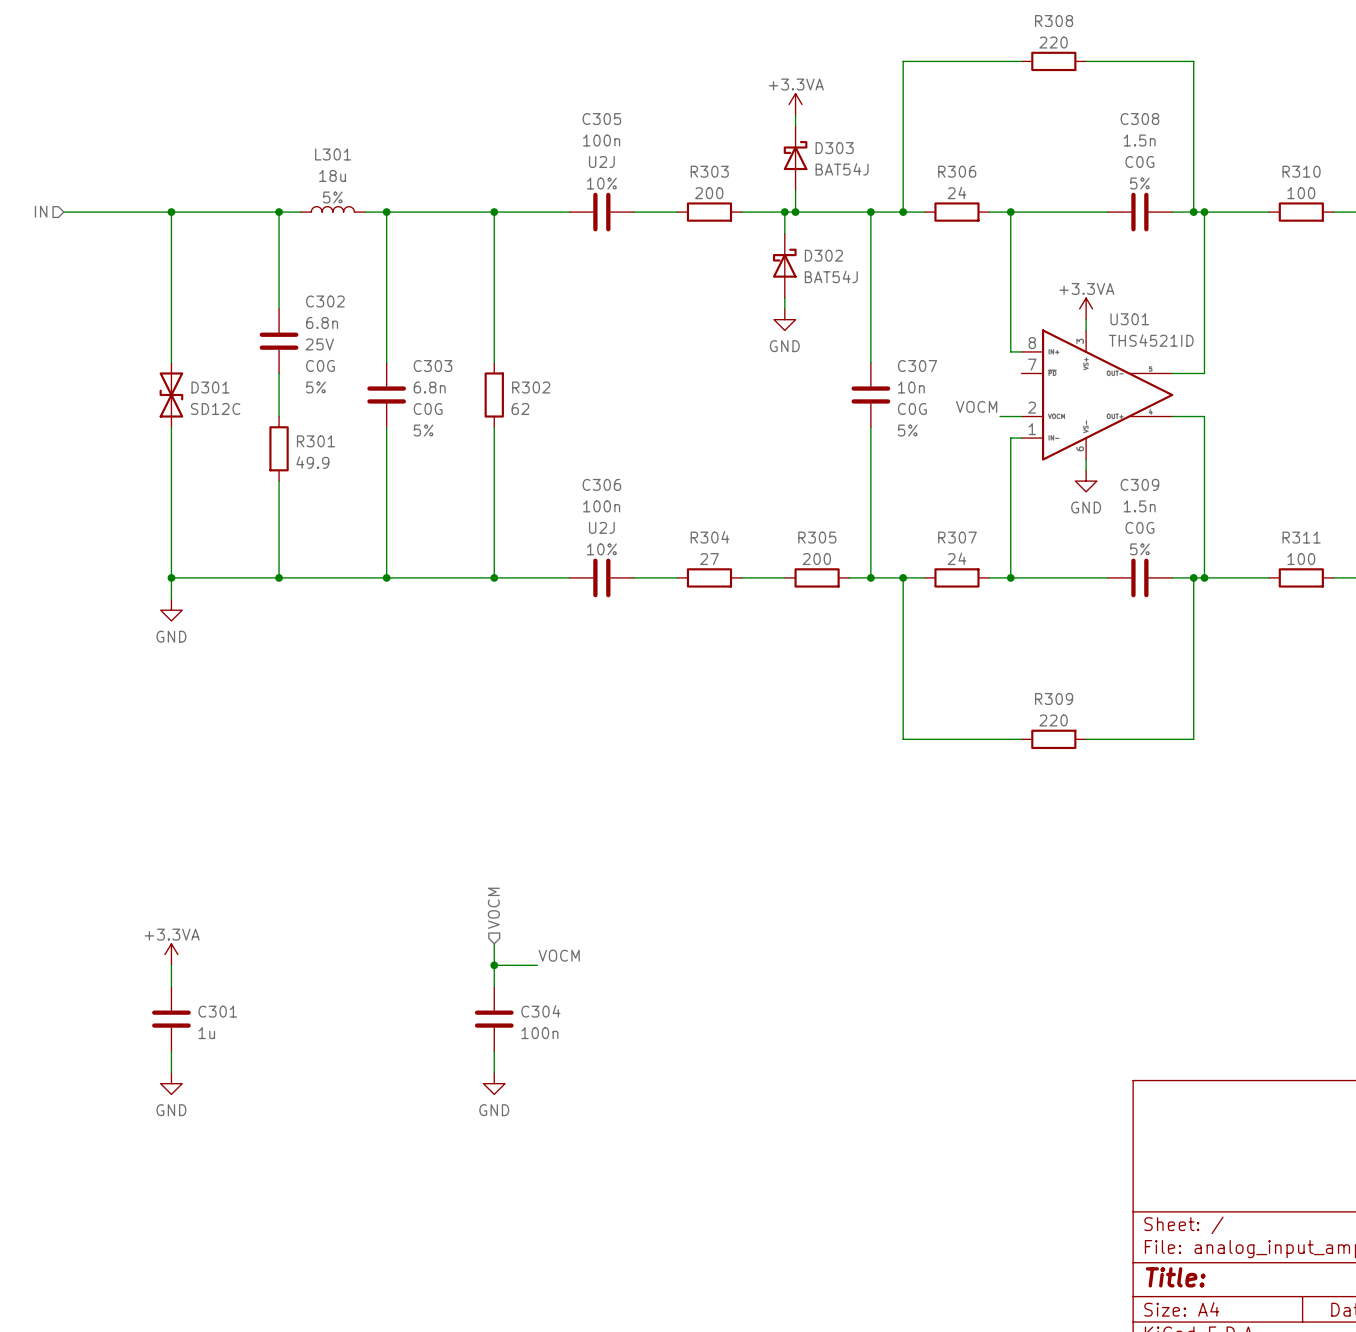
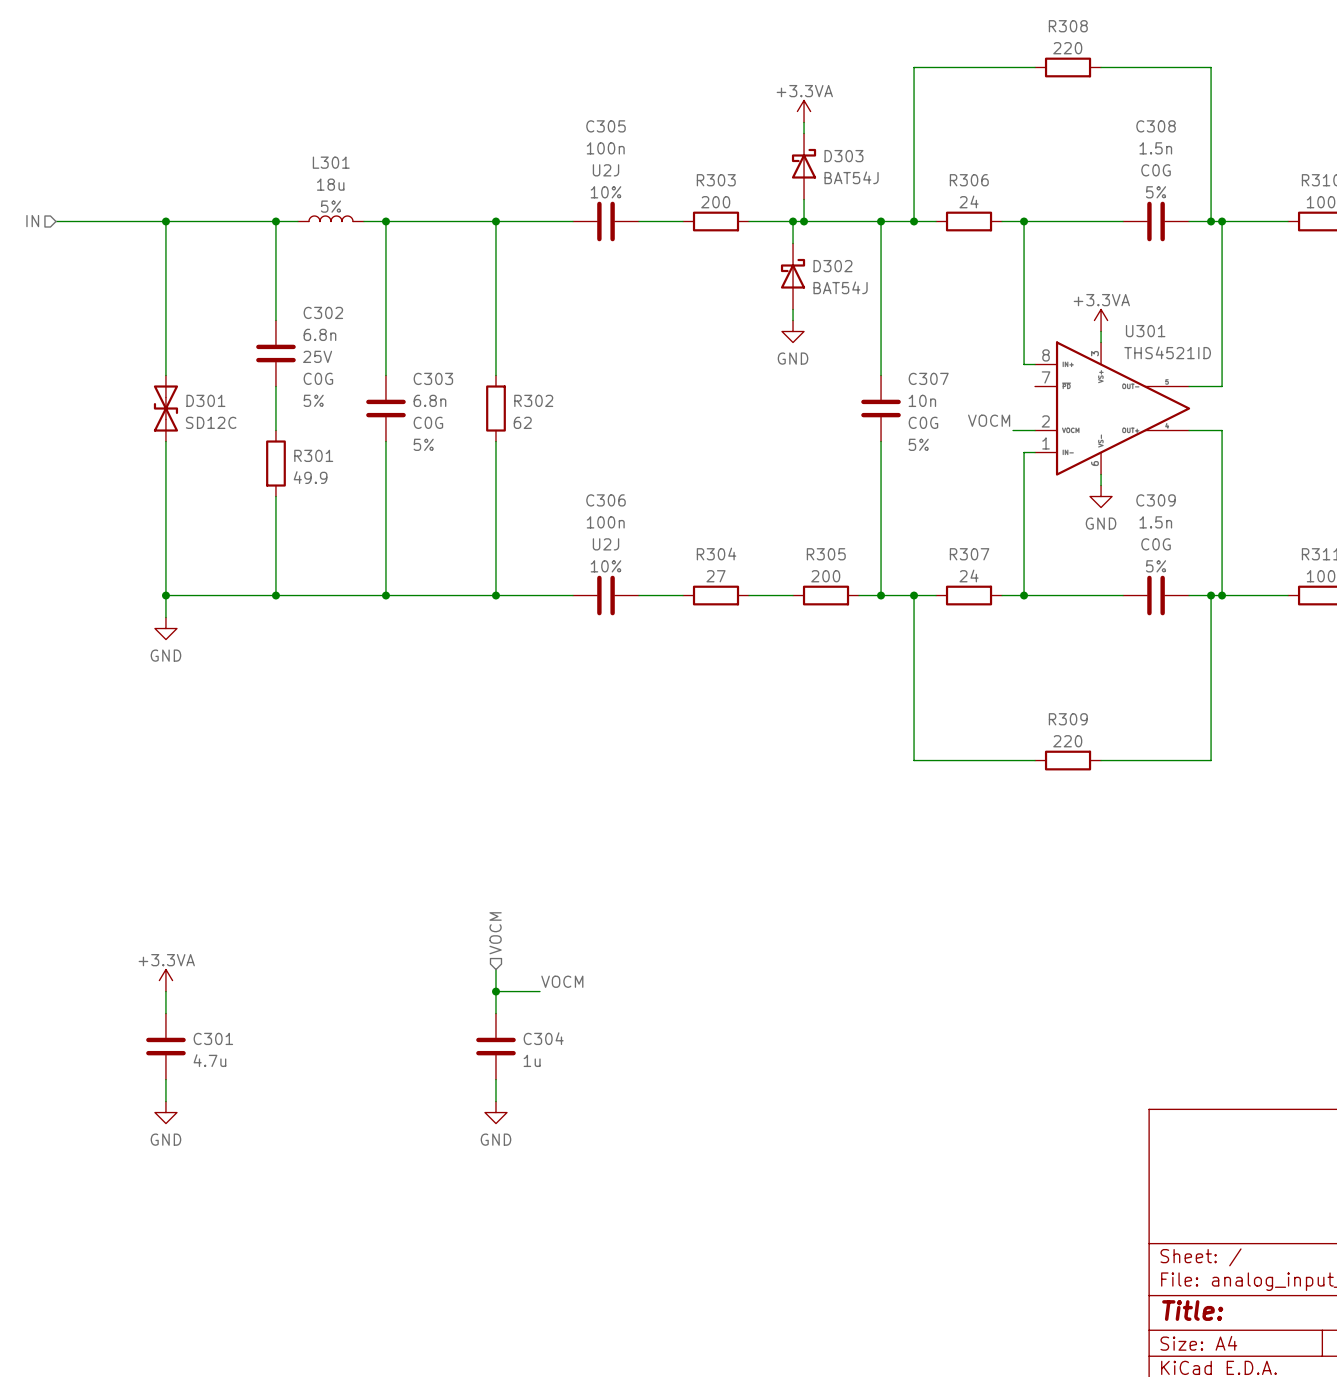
C301 value: 1u (206, 1033) -> 4.7u (209, 1060)
C304 value: 100n (539, 1033) -> 1u (532, 1060)

